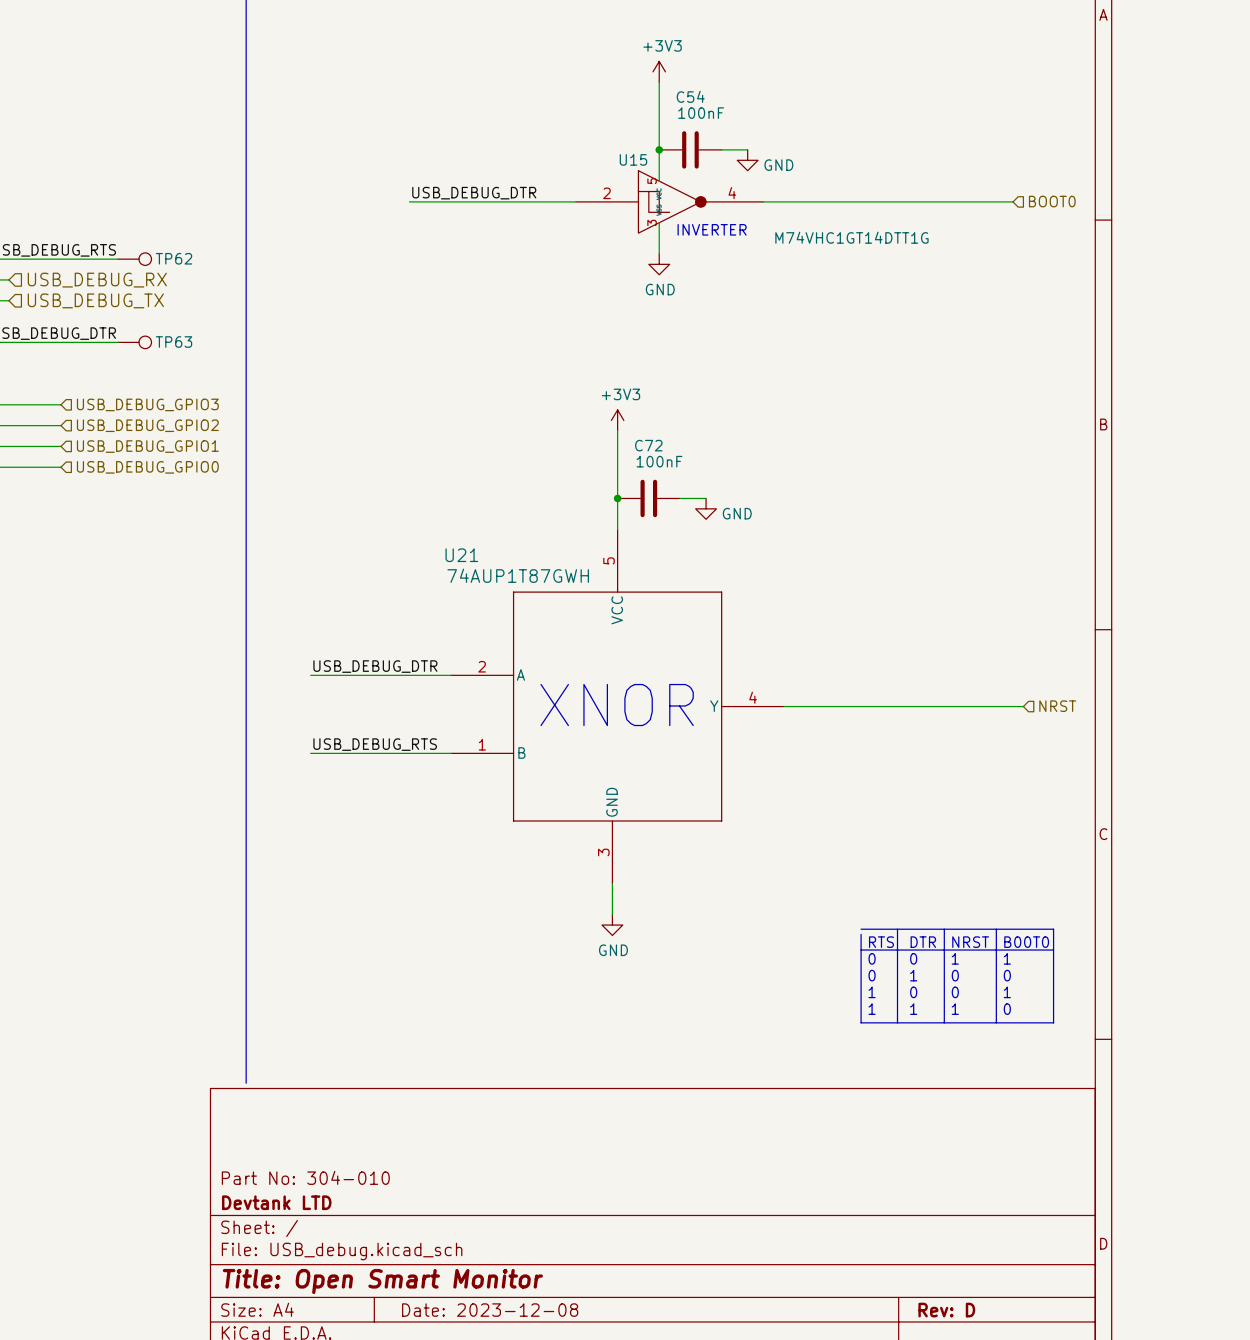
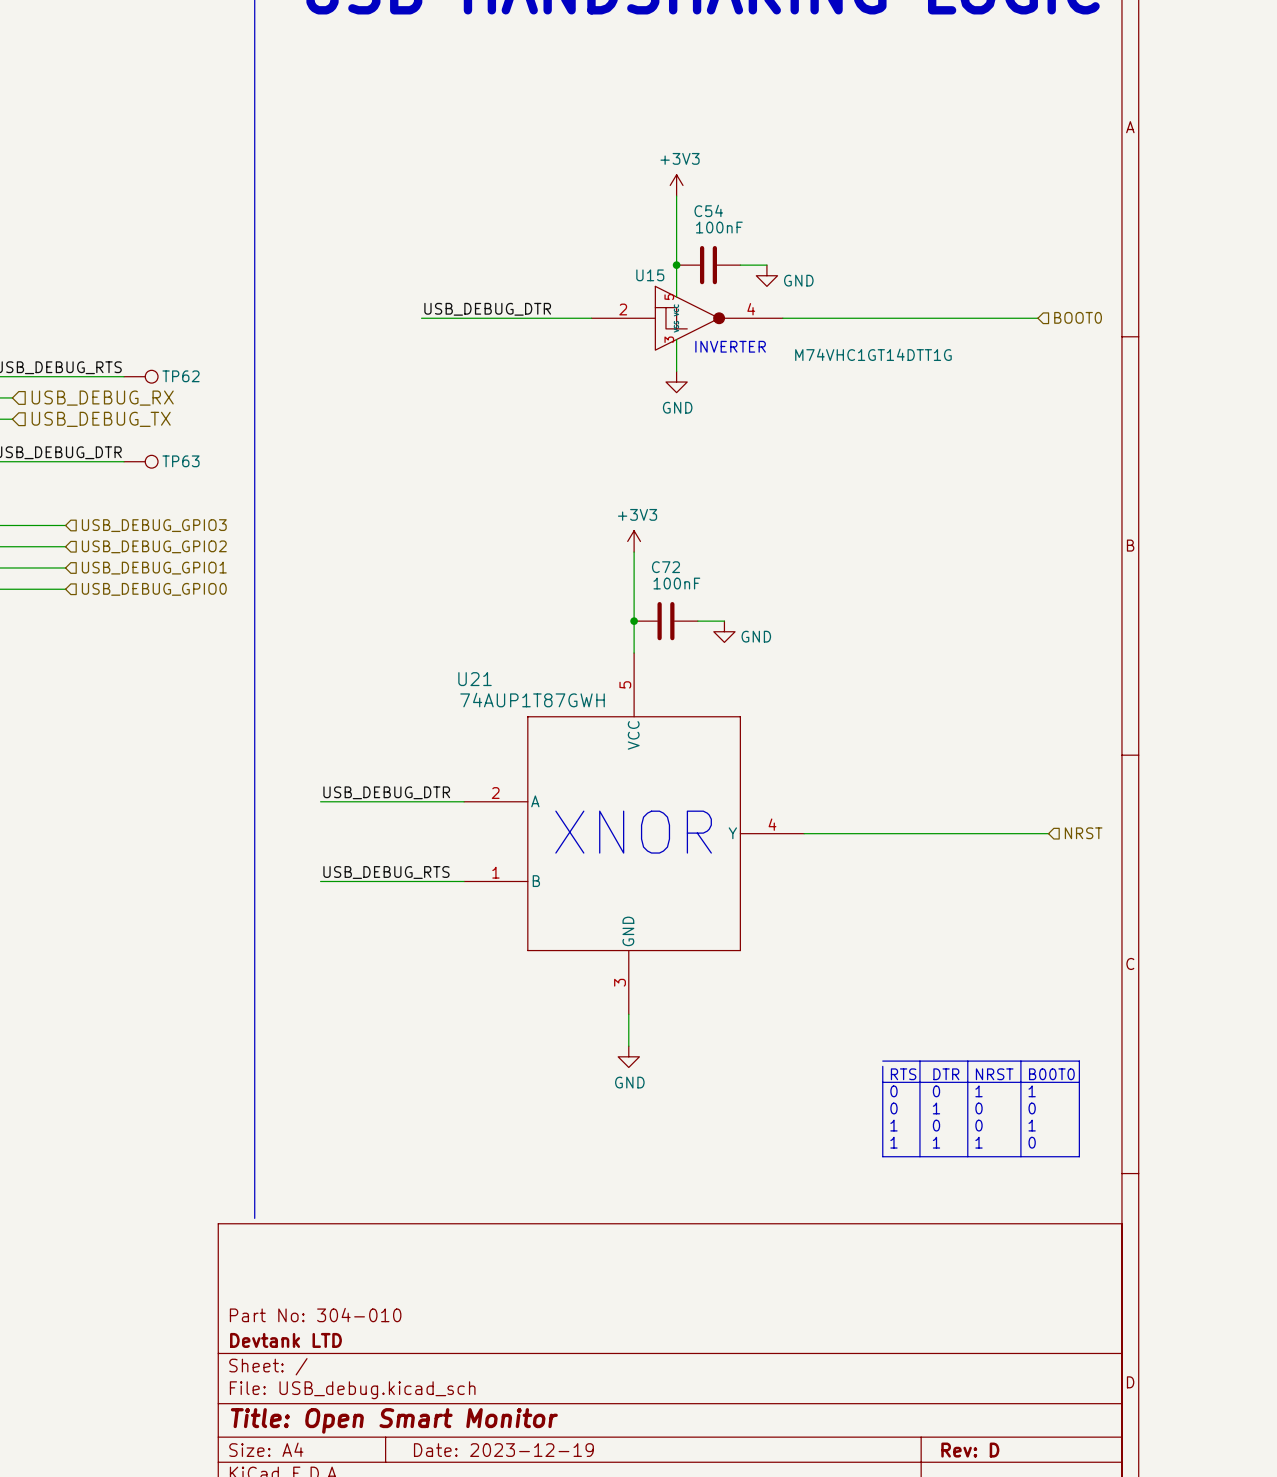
title block: Date: 2023-12-08 (490, 1310) -> Date: 2023-12-19 (503, 1450)

